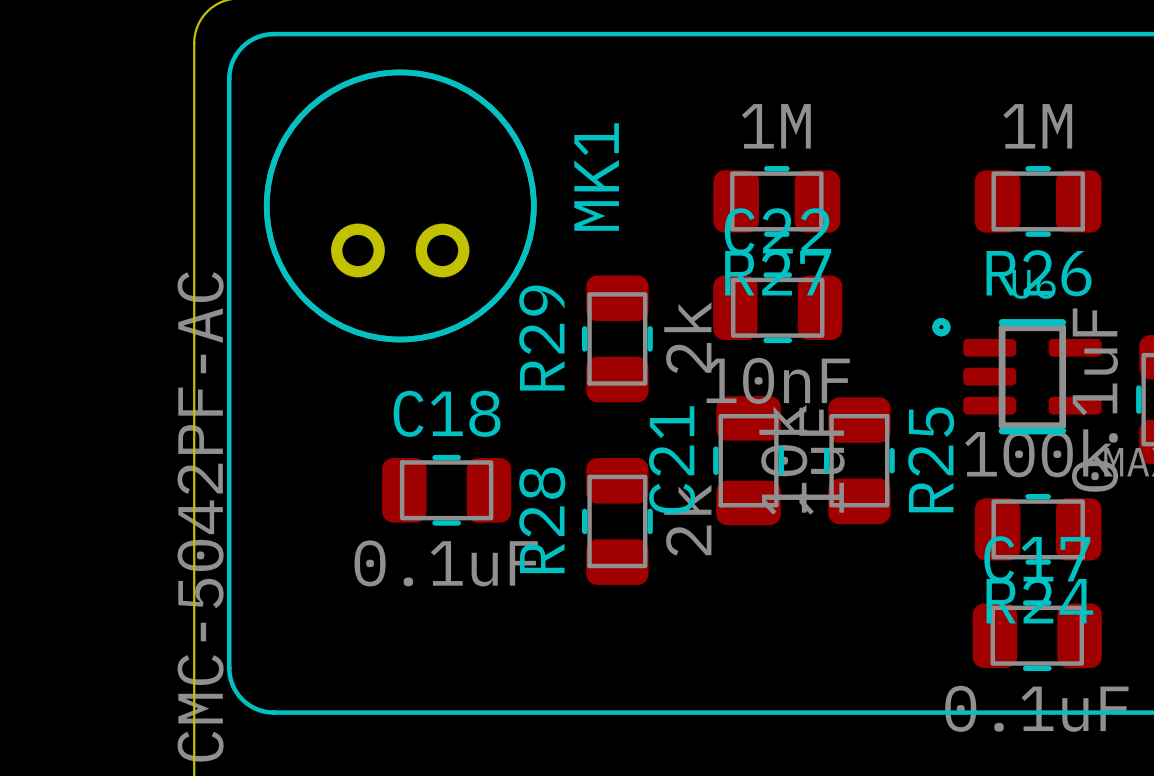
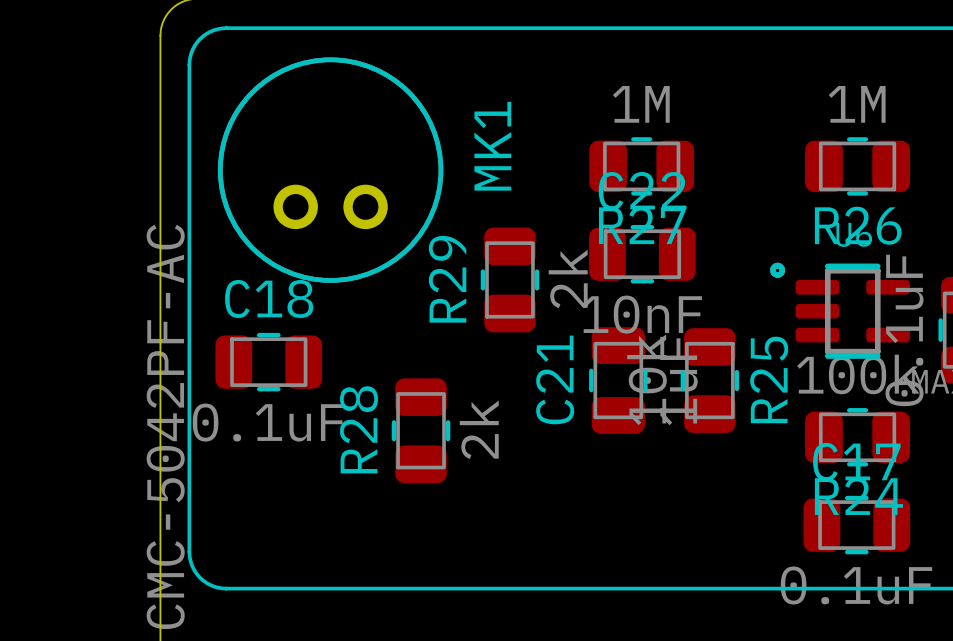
C18 position: (446, 490) -> (268, 362)
R28 position: (617, 521) -> (421, 430)

